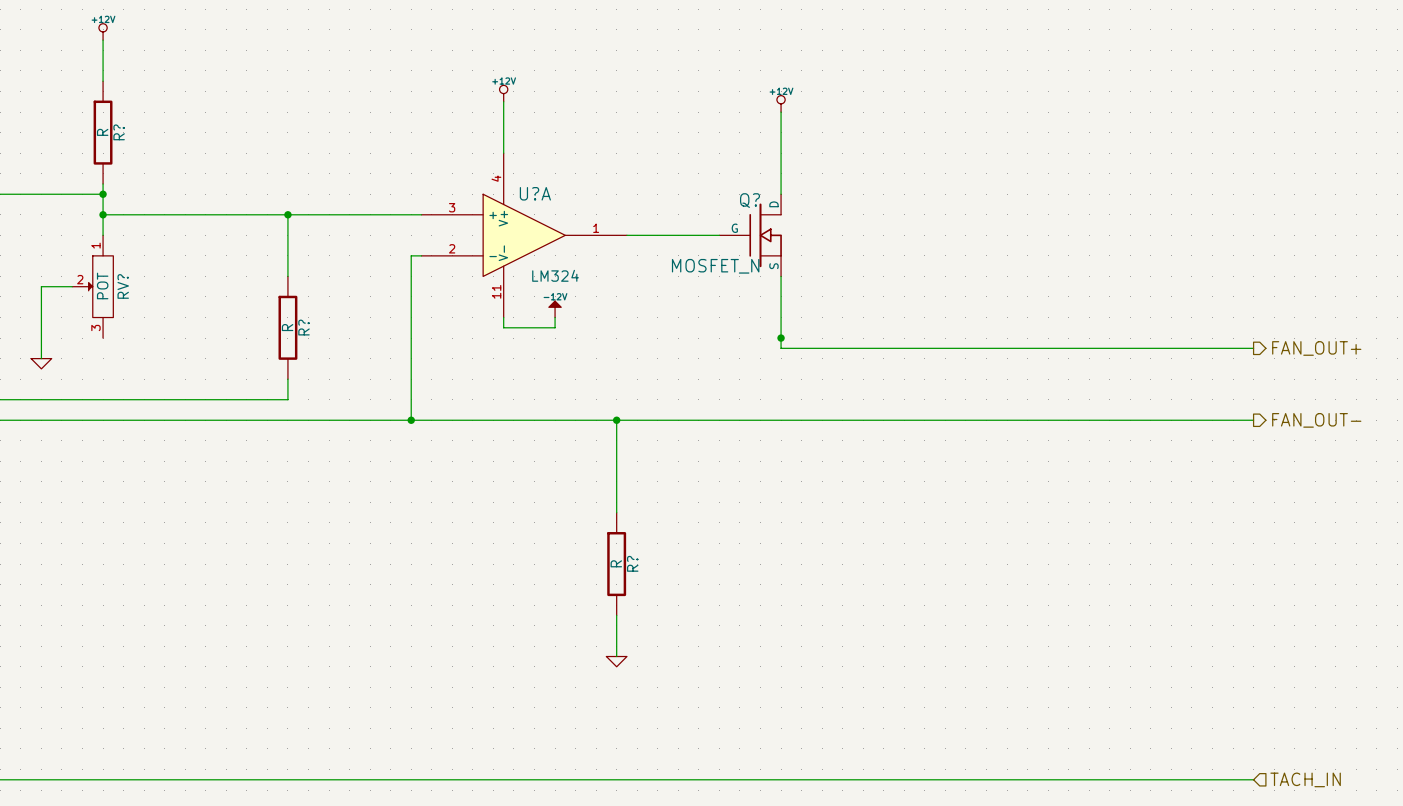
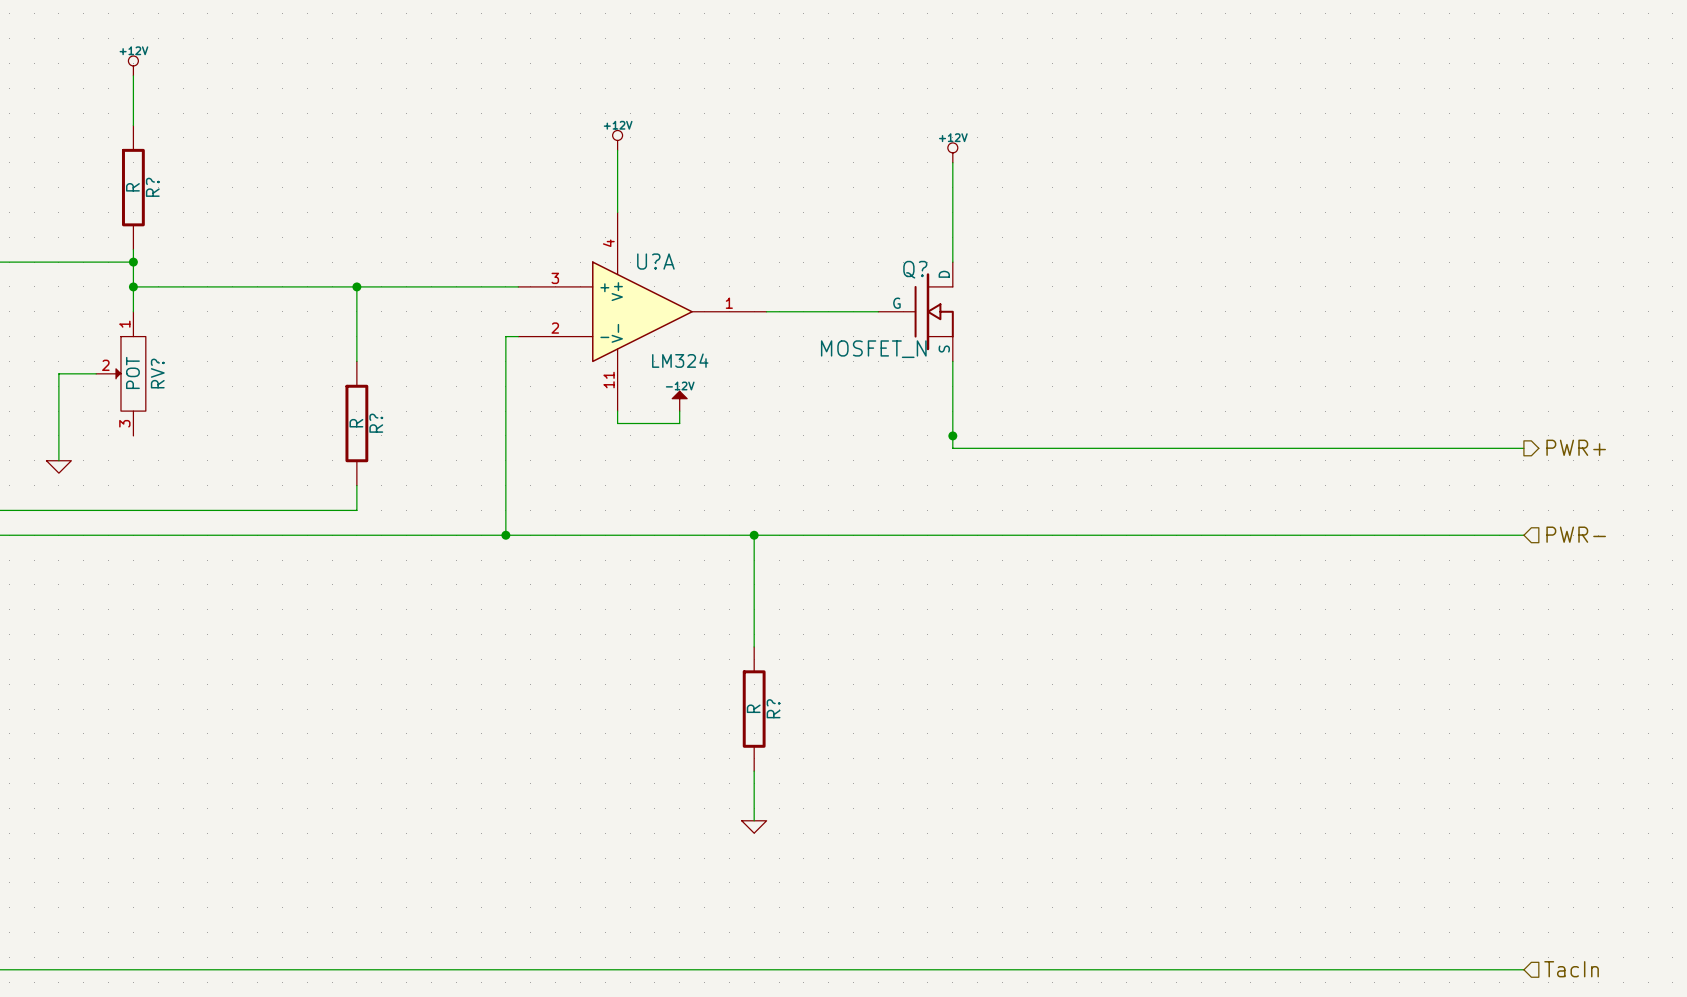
hierarchical label: FAN_OUT+ (1316, 348) -> PWR+ (1576, 447)
hierarchical label shape: output (1316, 420) -> input (1576, 534)
hierarchical label: FAN_OUT- (1316, 420) -> PWR- (1576, 534)
hierarchical label: TACH_IN (1305, 779) -> TacIn (1571, 969)

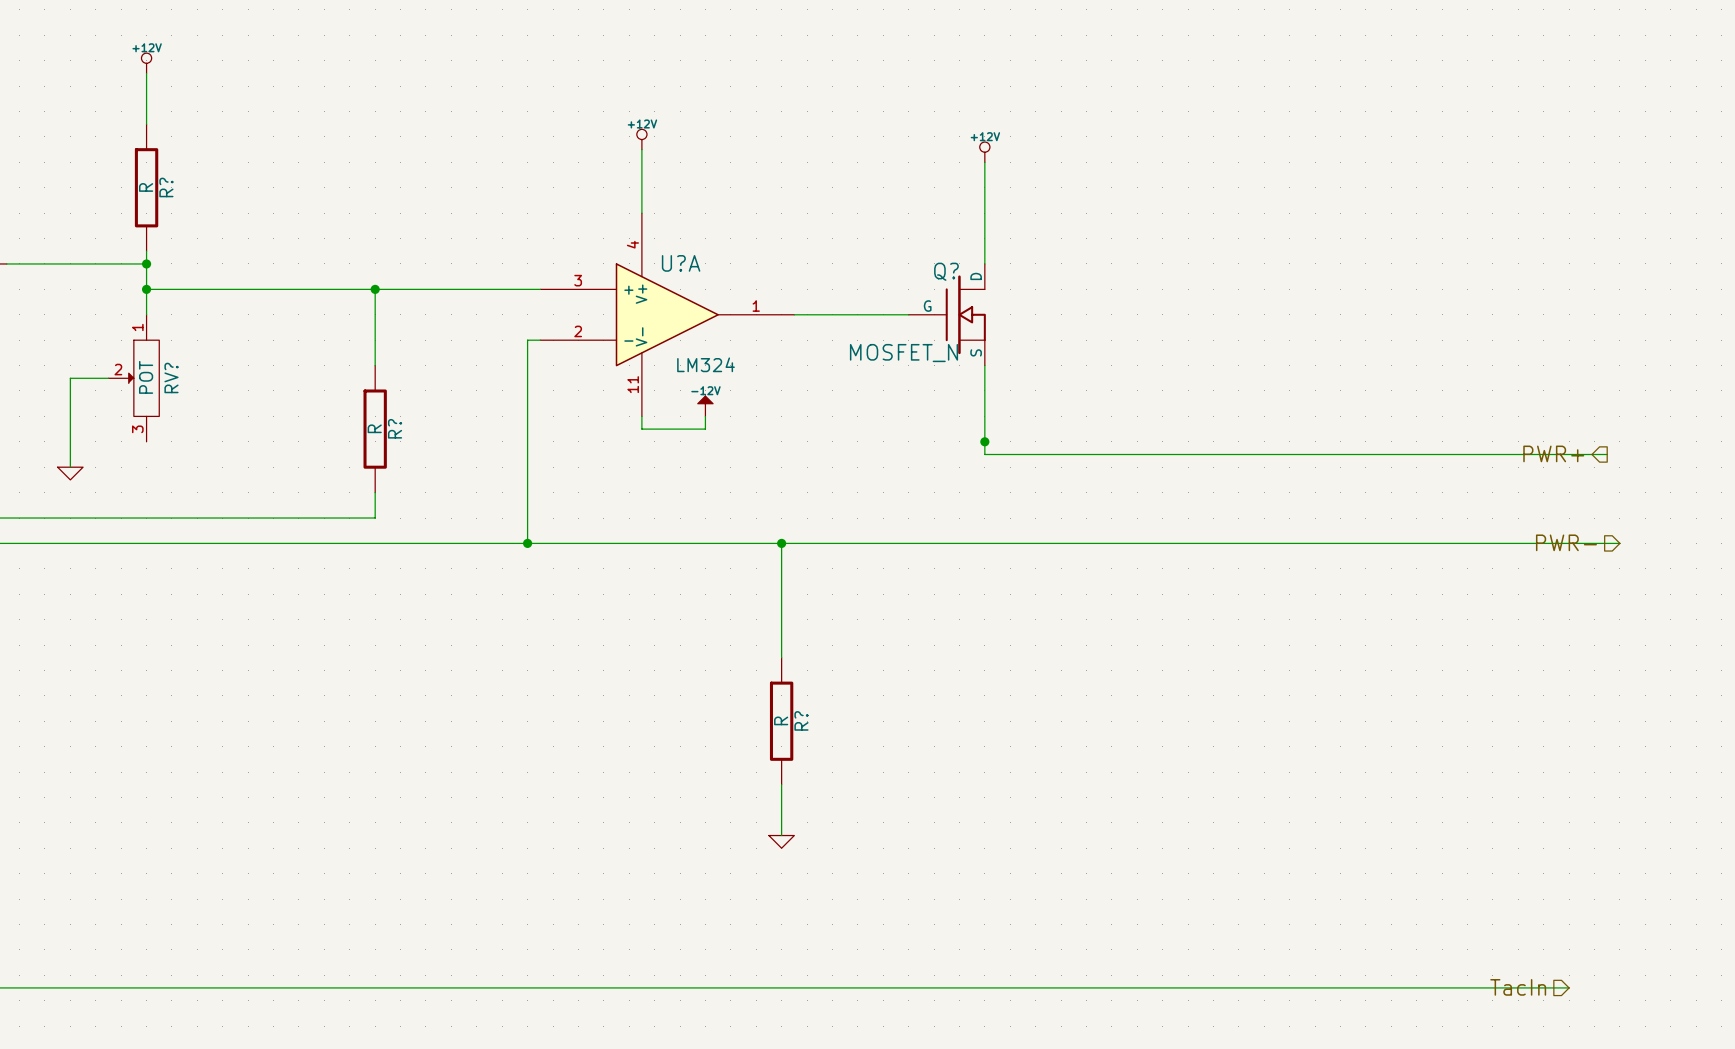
hierarchical label rotation: 0° (1576, 447) -> 180° (1553, 453)
wire: none -> (1569, 454) (1607, 454)
hierarchical label rotation: 0° (1576, 534) -> 180° (1566, 542)
wire: none -> (1569, 543) (1619, 543)
hierarchical label rotation: 0° (1571, 969) -> 180° (1518, 987)
hierarchical label position: TacIn (1571, 969) -> TacIn (1518, 987)

